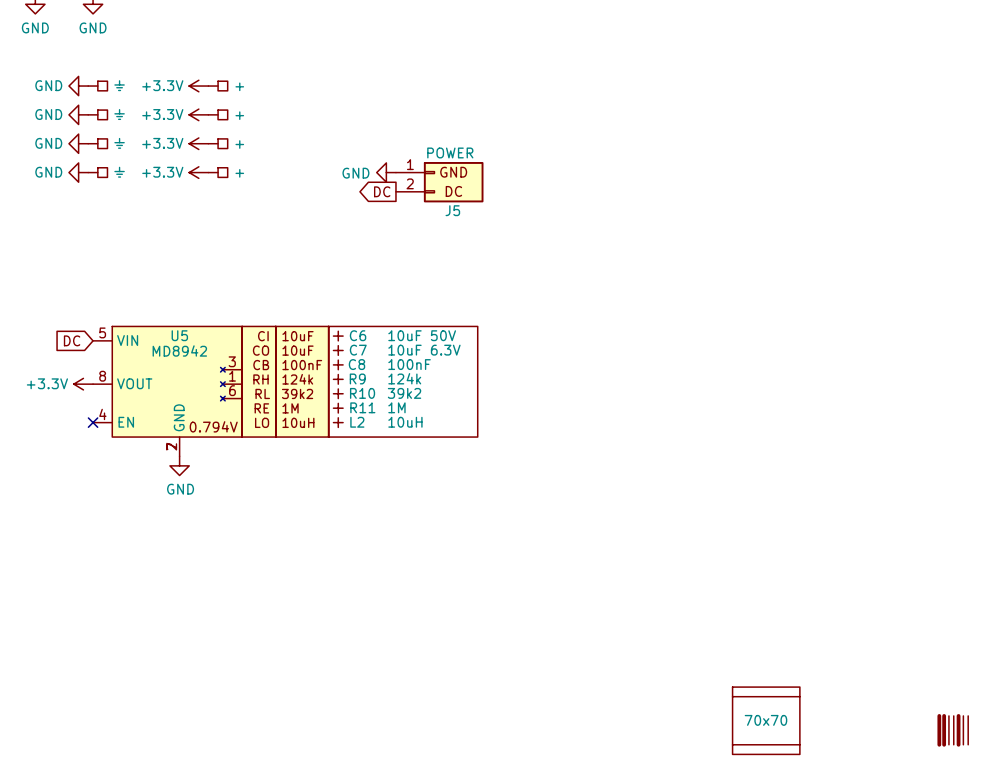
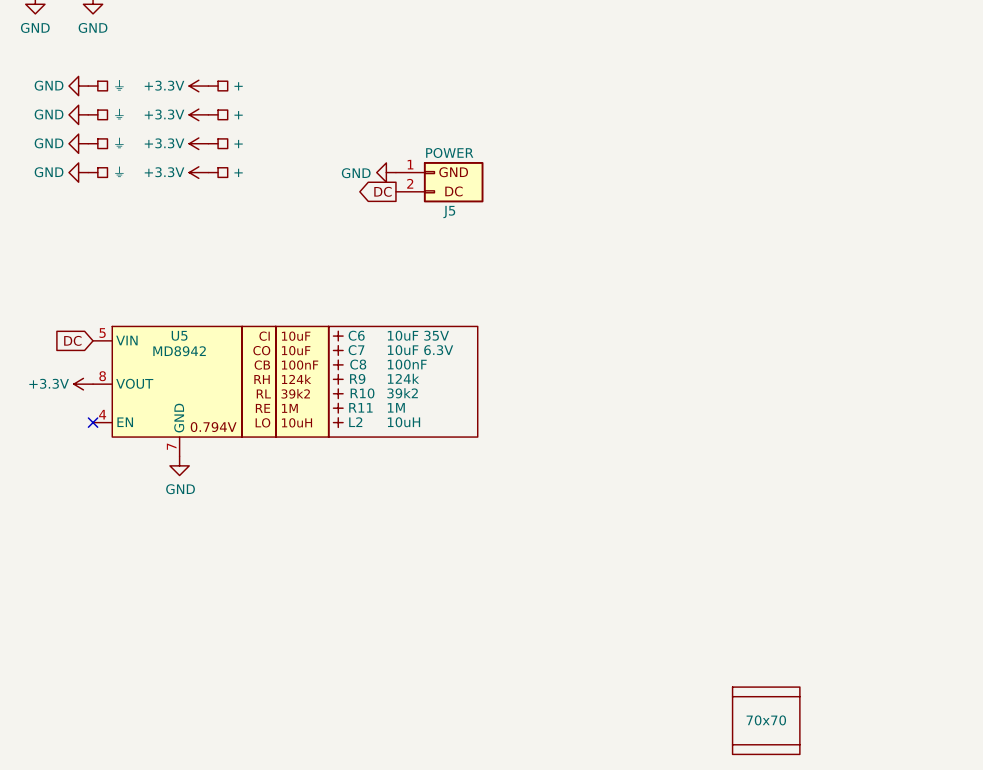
U5 symbol: [93, 326, 478, 457] -> [93, 326, 478, 457]
C6 value: 10uF 50V (422, 335) -> 10uF 35V (418, 335)
part: (952, 730) -> none

